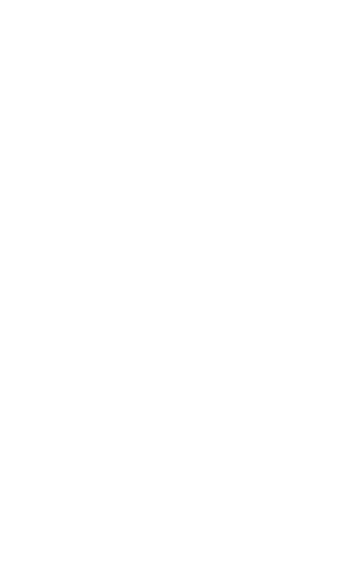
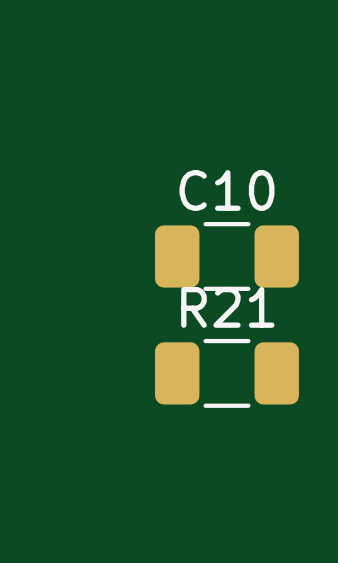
C10: none -> (226, 256)
R21: none -> (226, 373)

